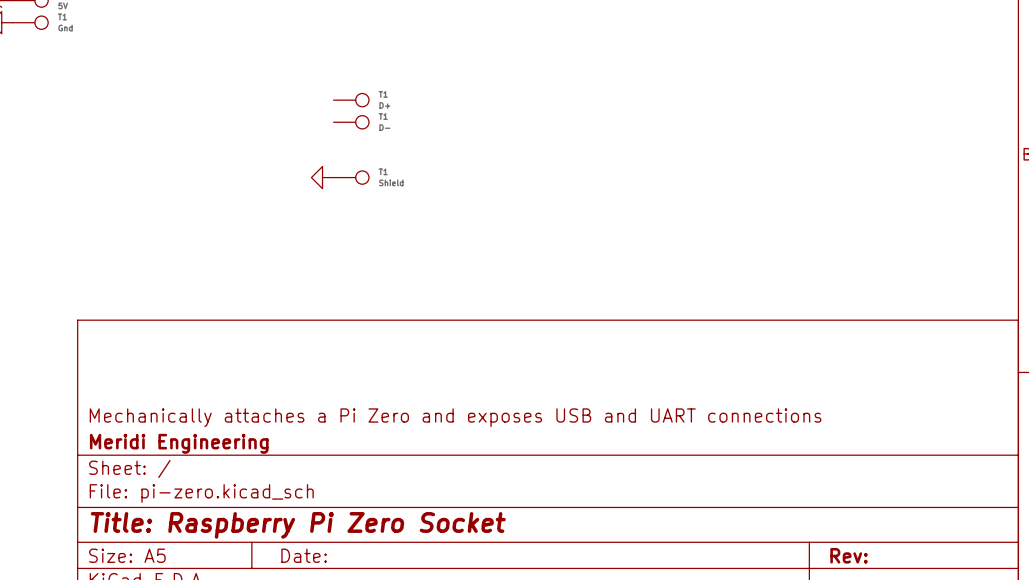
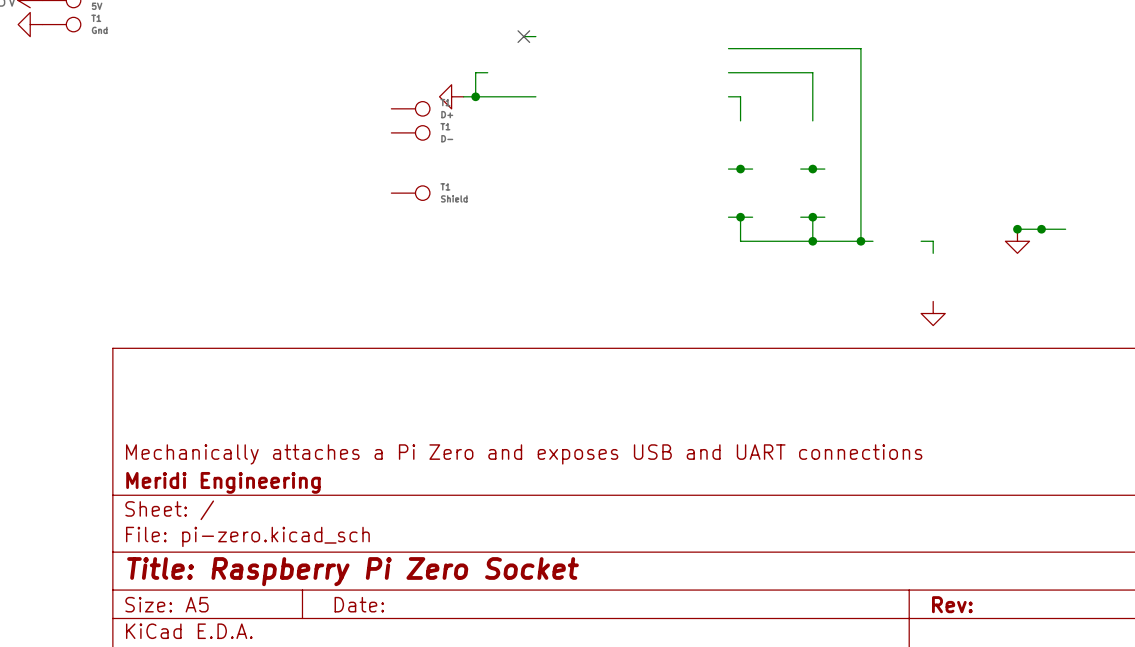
wire: none -> (523, 36) (535, 36)
no-connect mark: none -> (523, 36)
wire: none -> (728, 48) (860, 48) (860, 241)
wire: none -> (487, 72) (475, 72) (475, 96)
wire: none -> (728, 72) (812, 72) (812, 120)
wire: none -> (463, 96) (535, 96)
junction: none -> (475, 96)
wire: none -> (728, 96) (740, 96) (740, 120)
wire: none -> (728, 169) (752, 169)
junction: none -> (740, 169)
wire: none -> (800, 169) (824, 169)
junction: none -> (812, 169)
power symbol position: (322, 177) -> (451, 96)
wire: none -> (728, 217) (752, 217)
wire: none -> (740, 217) (740, 241) (872, 241)
junction: none -> (740, 217)
wire: none -> (800, 217) (824, 217)
wire: none -> (812, 217) (812, 241)
junction: none -> (812, 217)
wire: none -> (1017, 229) (1065, 229)
junction: none -> (1017, 229)
junction: none -> (1041, 229)
junction: none -> (812, 241)
junction: none -> (860, 241)
wire: none -> (921, 241) (933, 241) (933, 253)
power symbol: none -> (1017, 241)
power symbol: none -> (933, 313)

